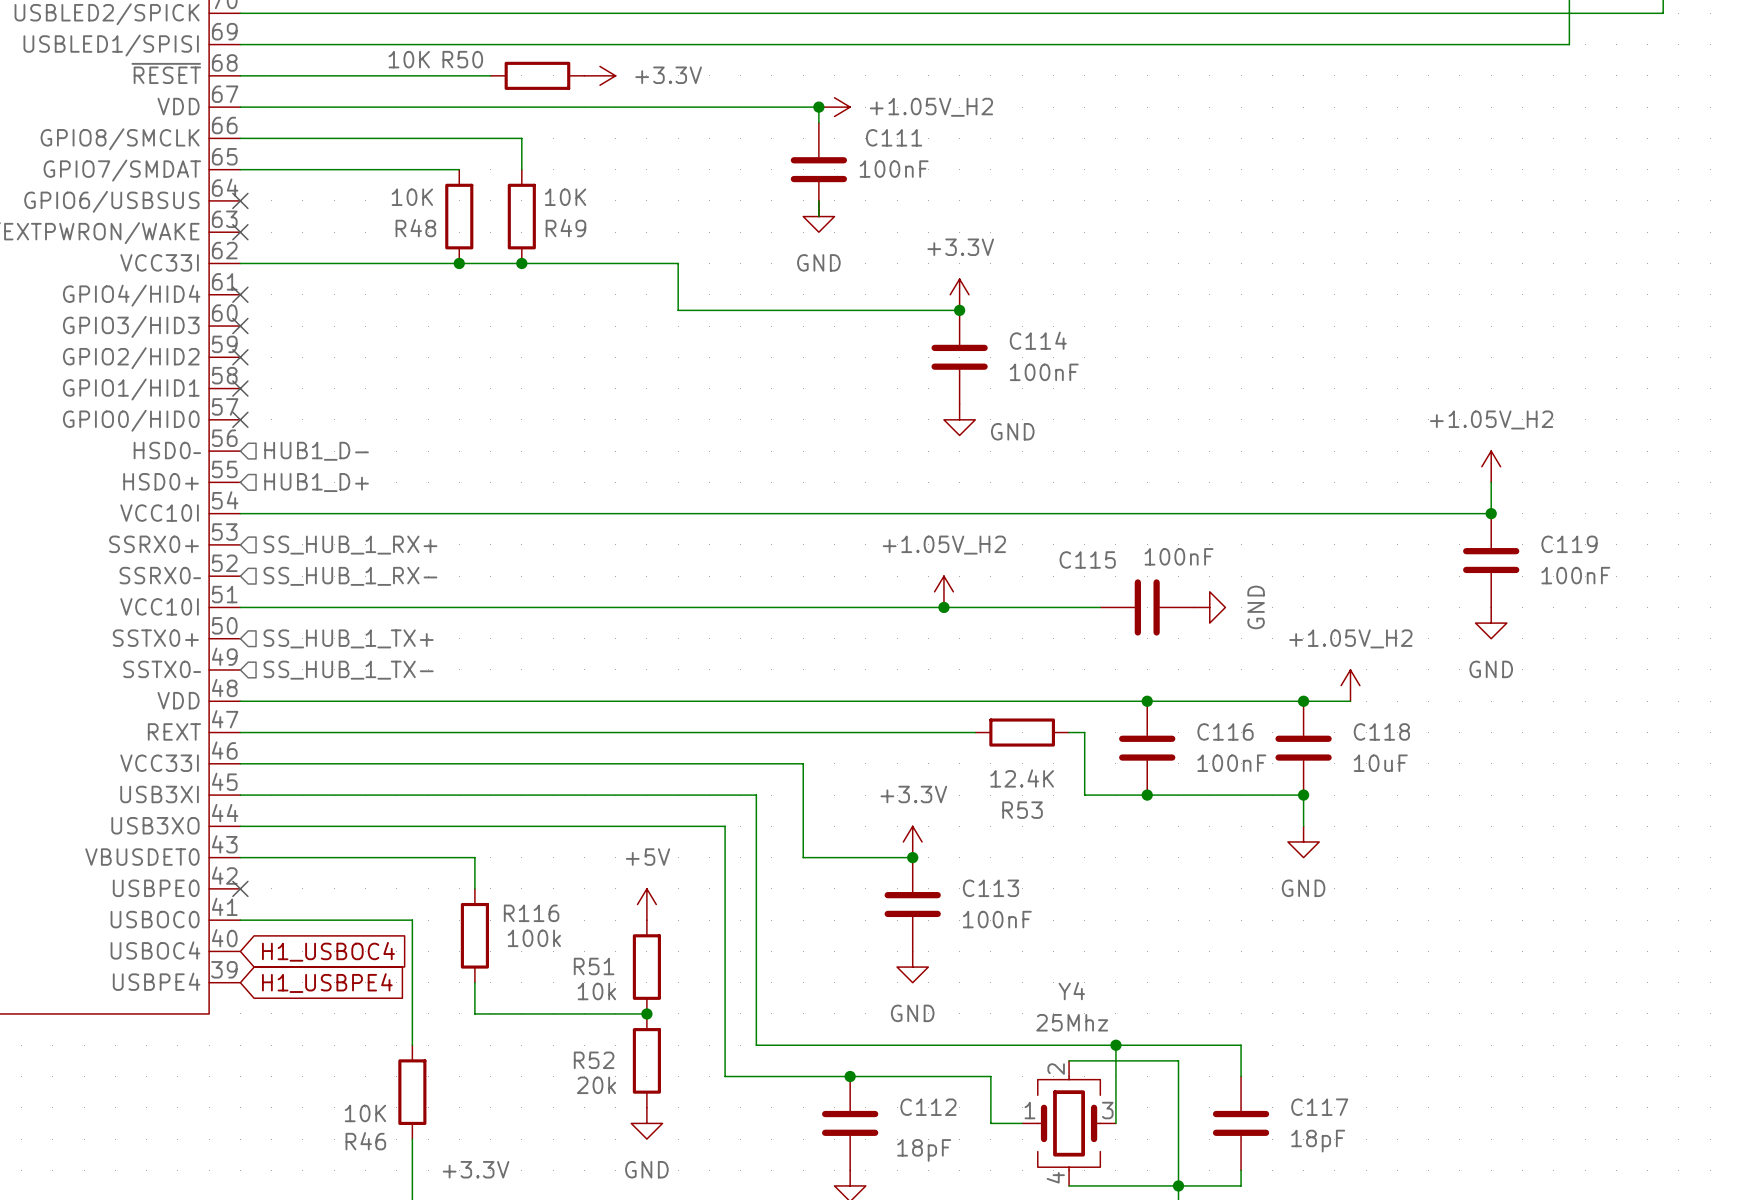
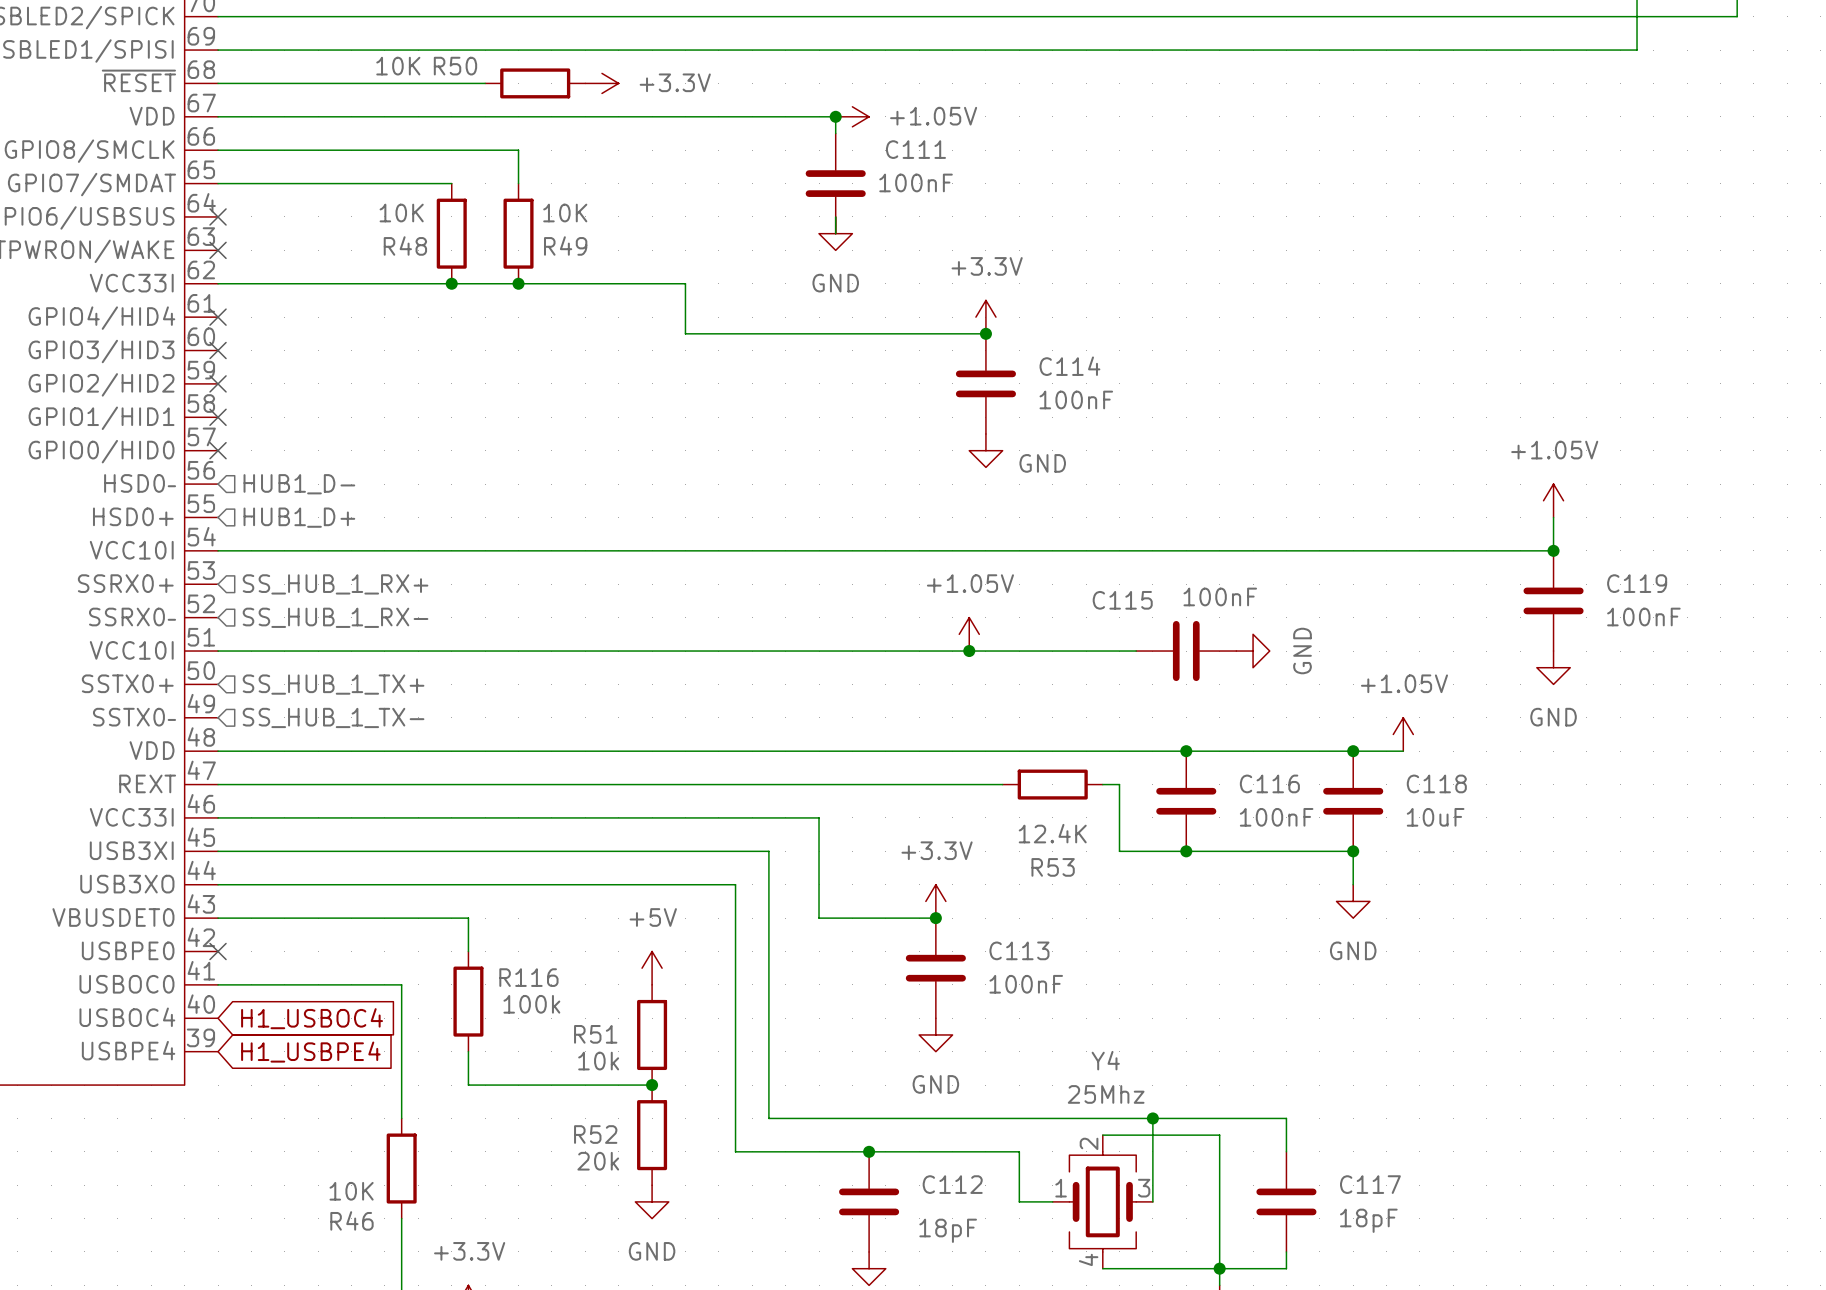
power symbol: +1.05V_H2 (834, 107) -> +1.05V (852, 116)
power symbol: +1.05V_H2 (1491, 466) -> +1.05V (1553, 500)
power symbol: +1.05V_H2 (943, 591) -> +1.05V (969, 634)
power symbol: +1.05V_H2 (1350, 685) -> +1.05V (1403, 734)

